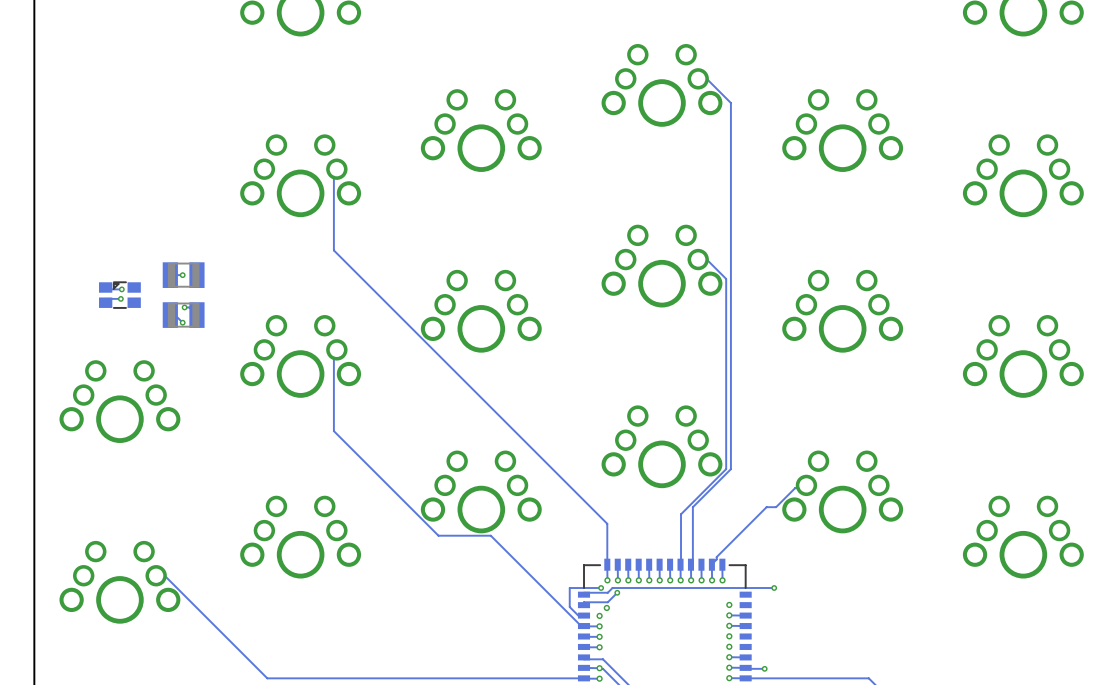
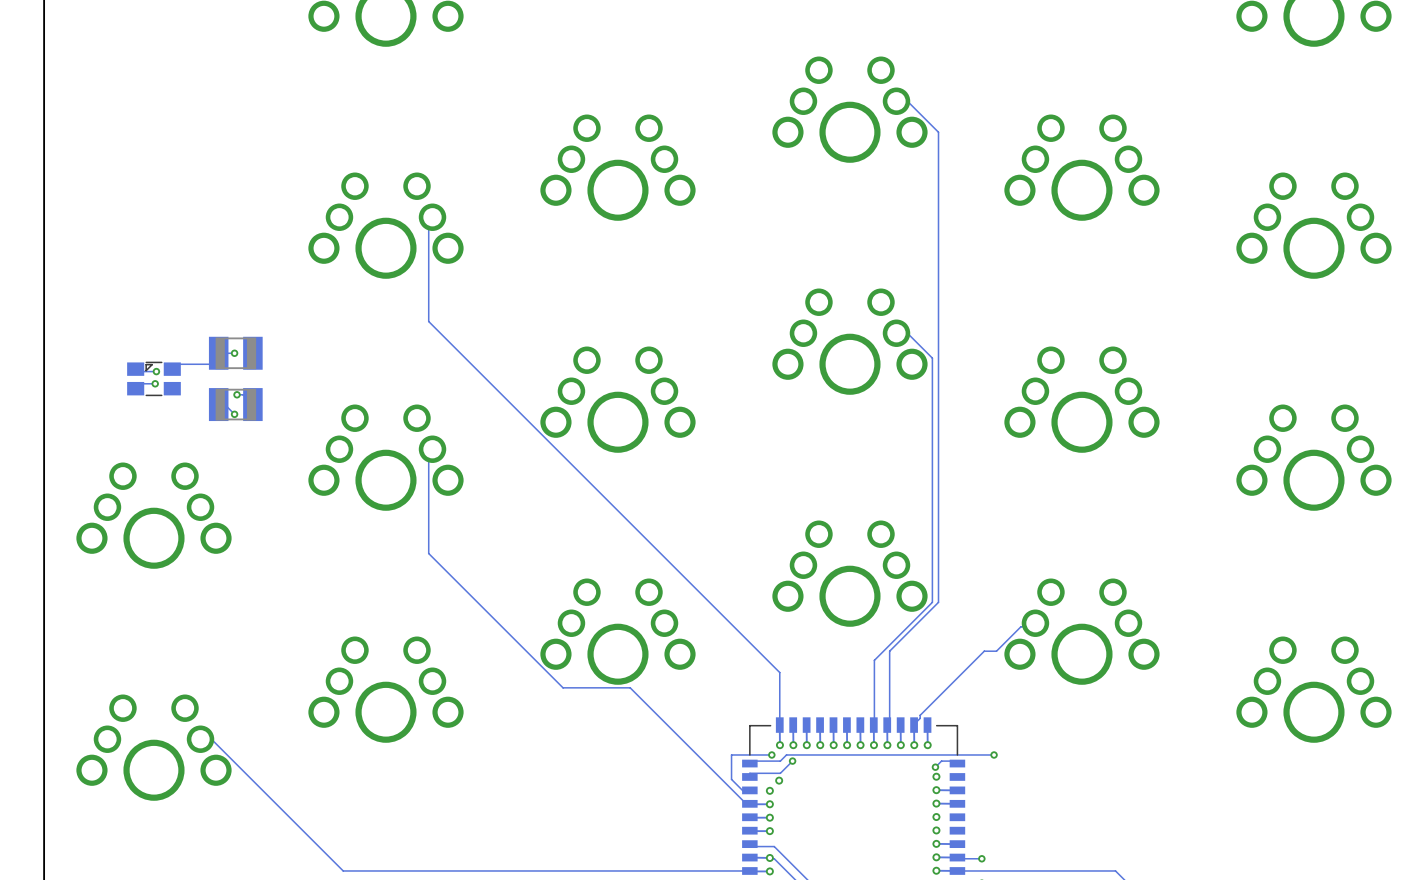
track: none -> (218, 353) (221, 358) (215, 364) (172, 364) (172, 369)
track: none -> (957, 763) (953, 761) (941, 761) (935, 767)
via: none -> (935, 767)

